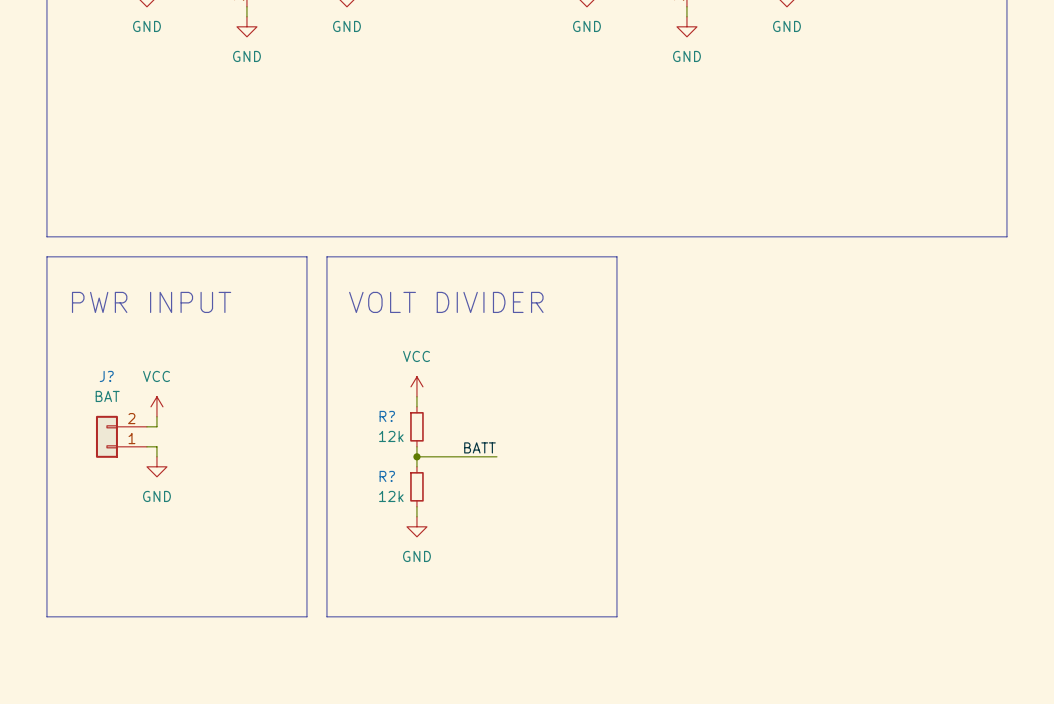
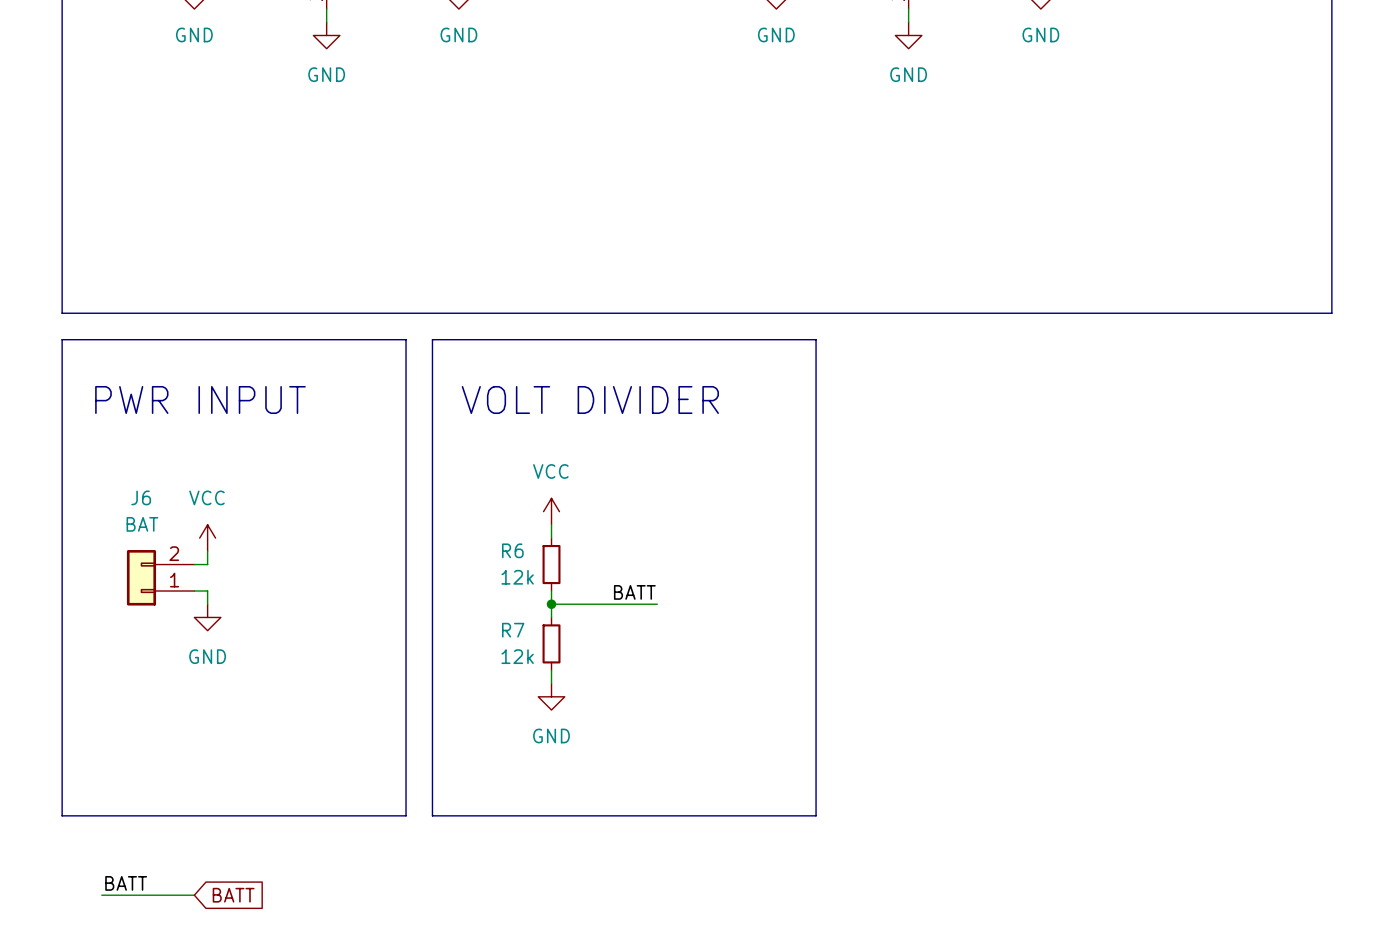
J? name: J? (106, 376) -> J6 (141, 497)
R? name: R? (387, 416) -> R6 (512, 550)
R? name: R? (387, 476) -> R7 (513, 630)
label: none -> BATT (126, 883)
wire: none -> (101, 895) (194, 895)
global label: none -> BATT (233, 895)

